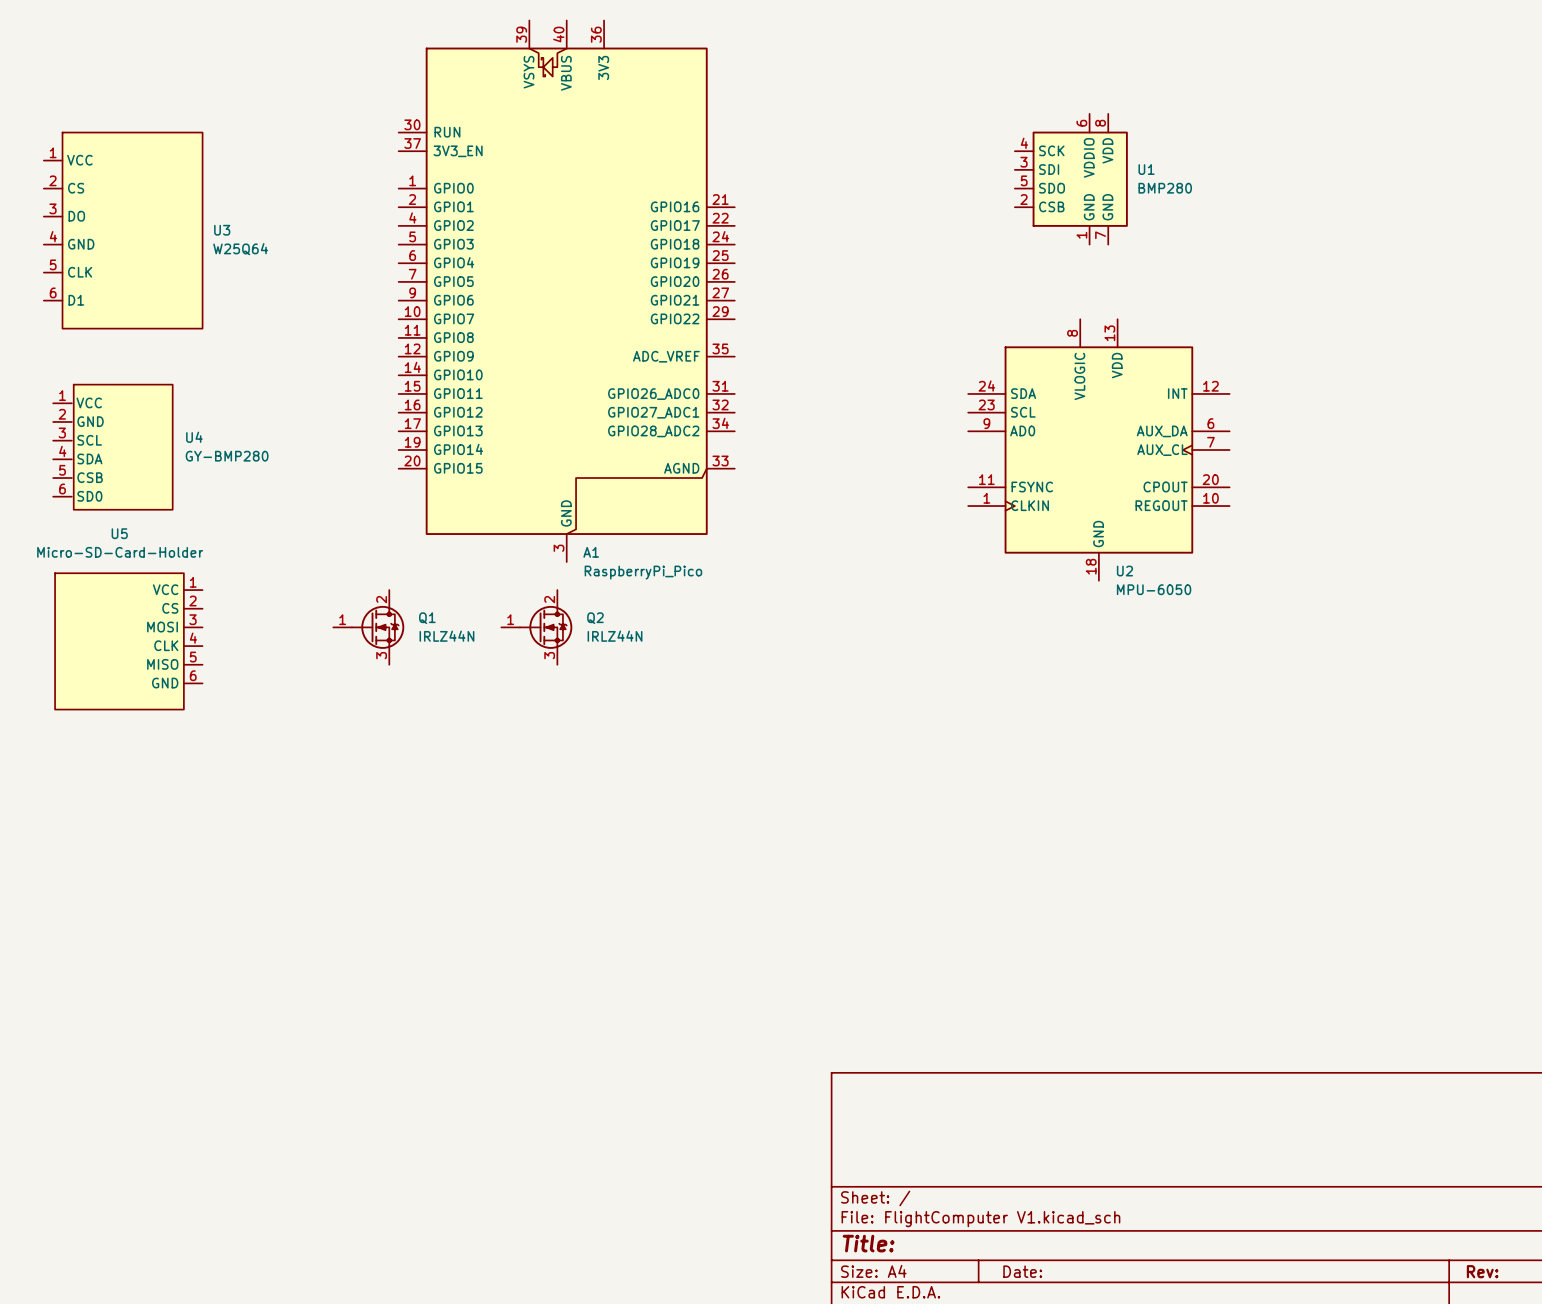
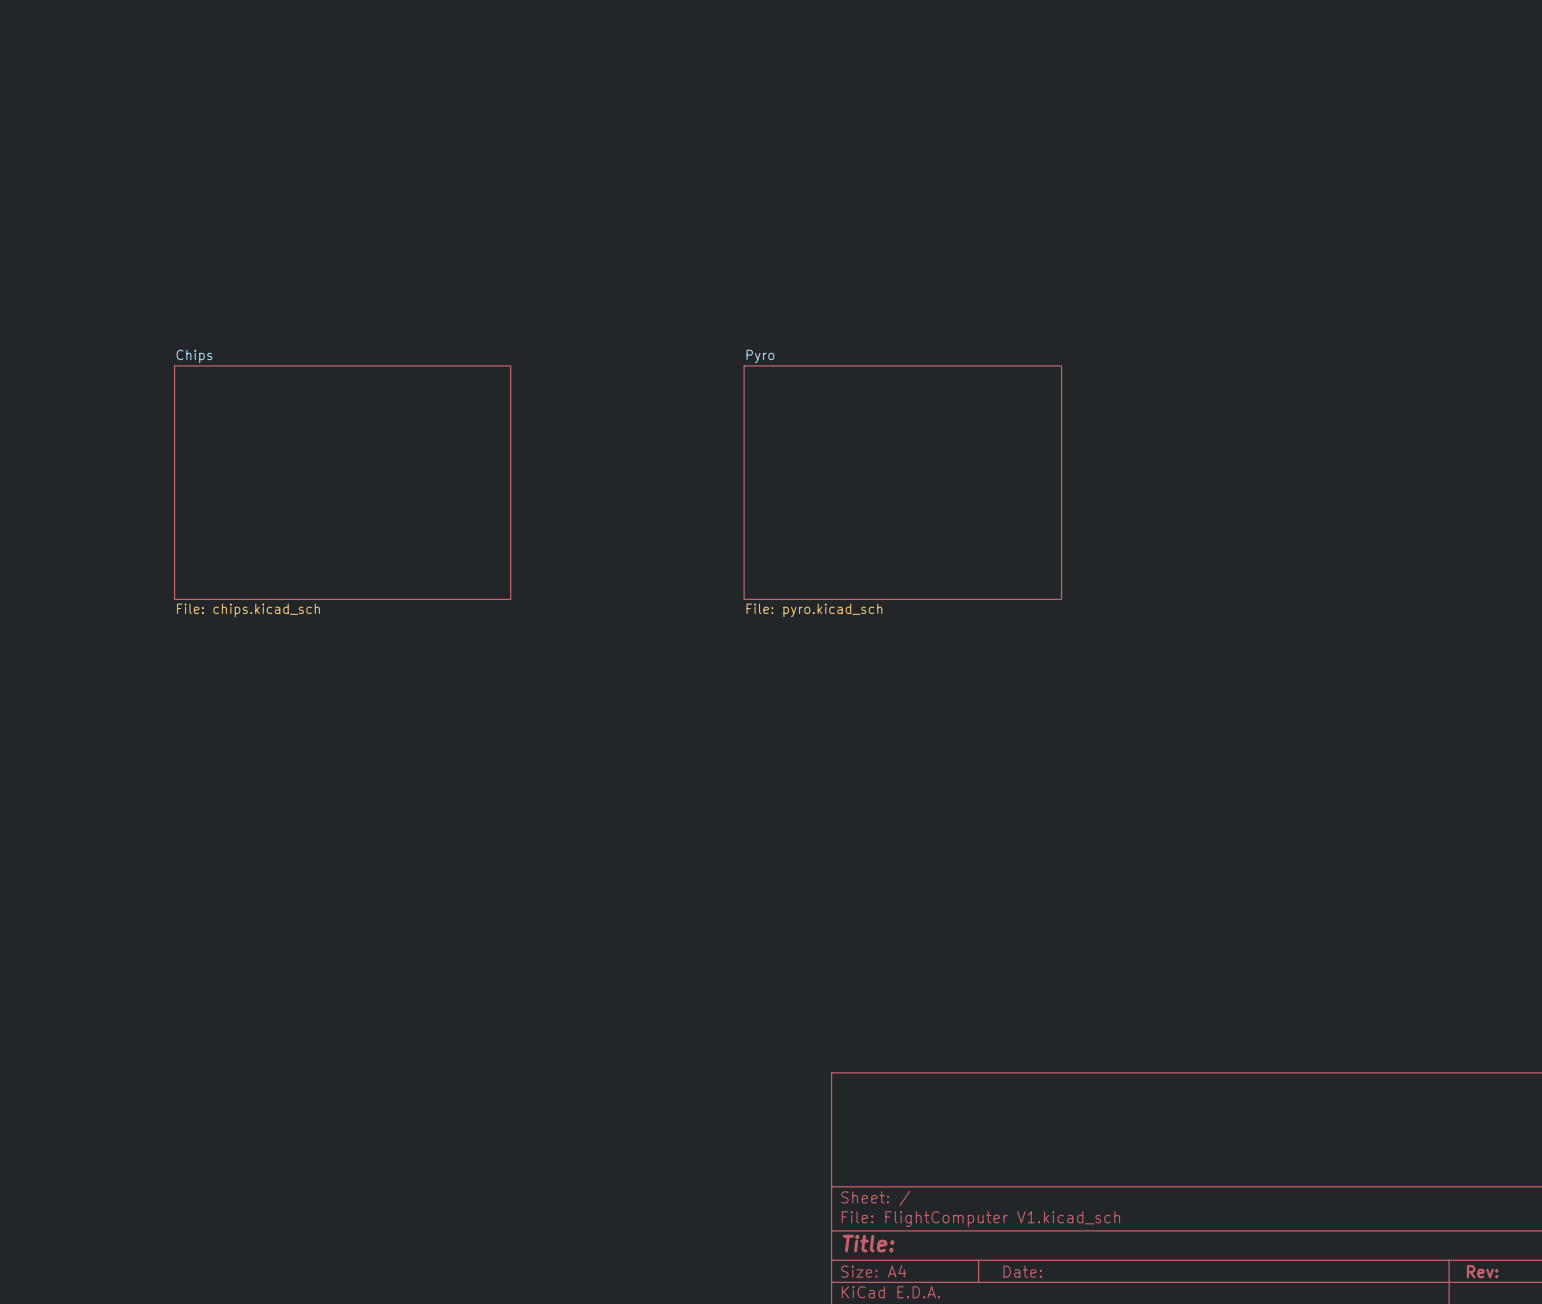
U1: BMP280 (1071, 179) -> none
U3: W25Q64 (123, 230) -> none
A1: RaspberryPi_Pico (566, 291) -> none
U4: GY-BMP280 (112, 447) -> none
U2: MPU-6050 (1098, 449) -> none
sheet Chips: none -> File: chips.kicad_sch (342, 482)
sheet Pyro: none -> File: pyro.kicad_sch (902, 482)
Q1: IRLZ44N (368, 627) -> none
Q2: IRLZ44N (536, 627) -> none
U5: Micro-SD-Card-Holder (128, 641) -> none

